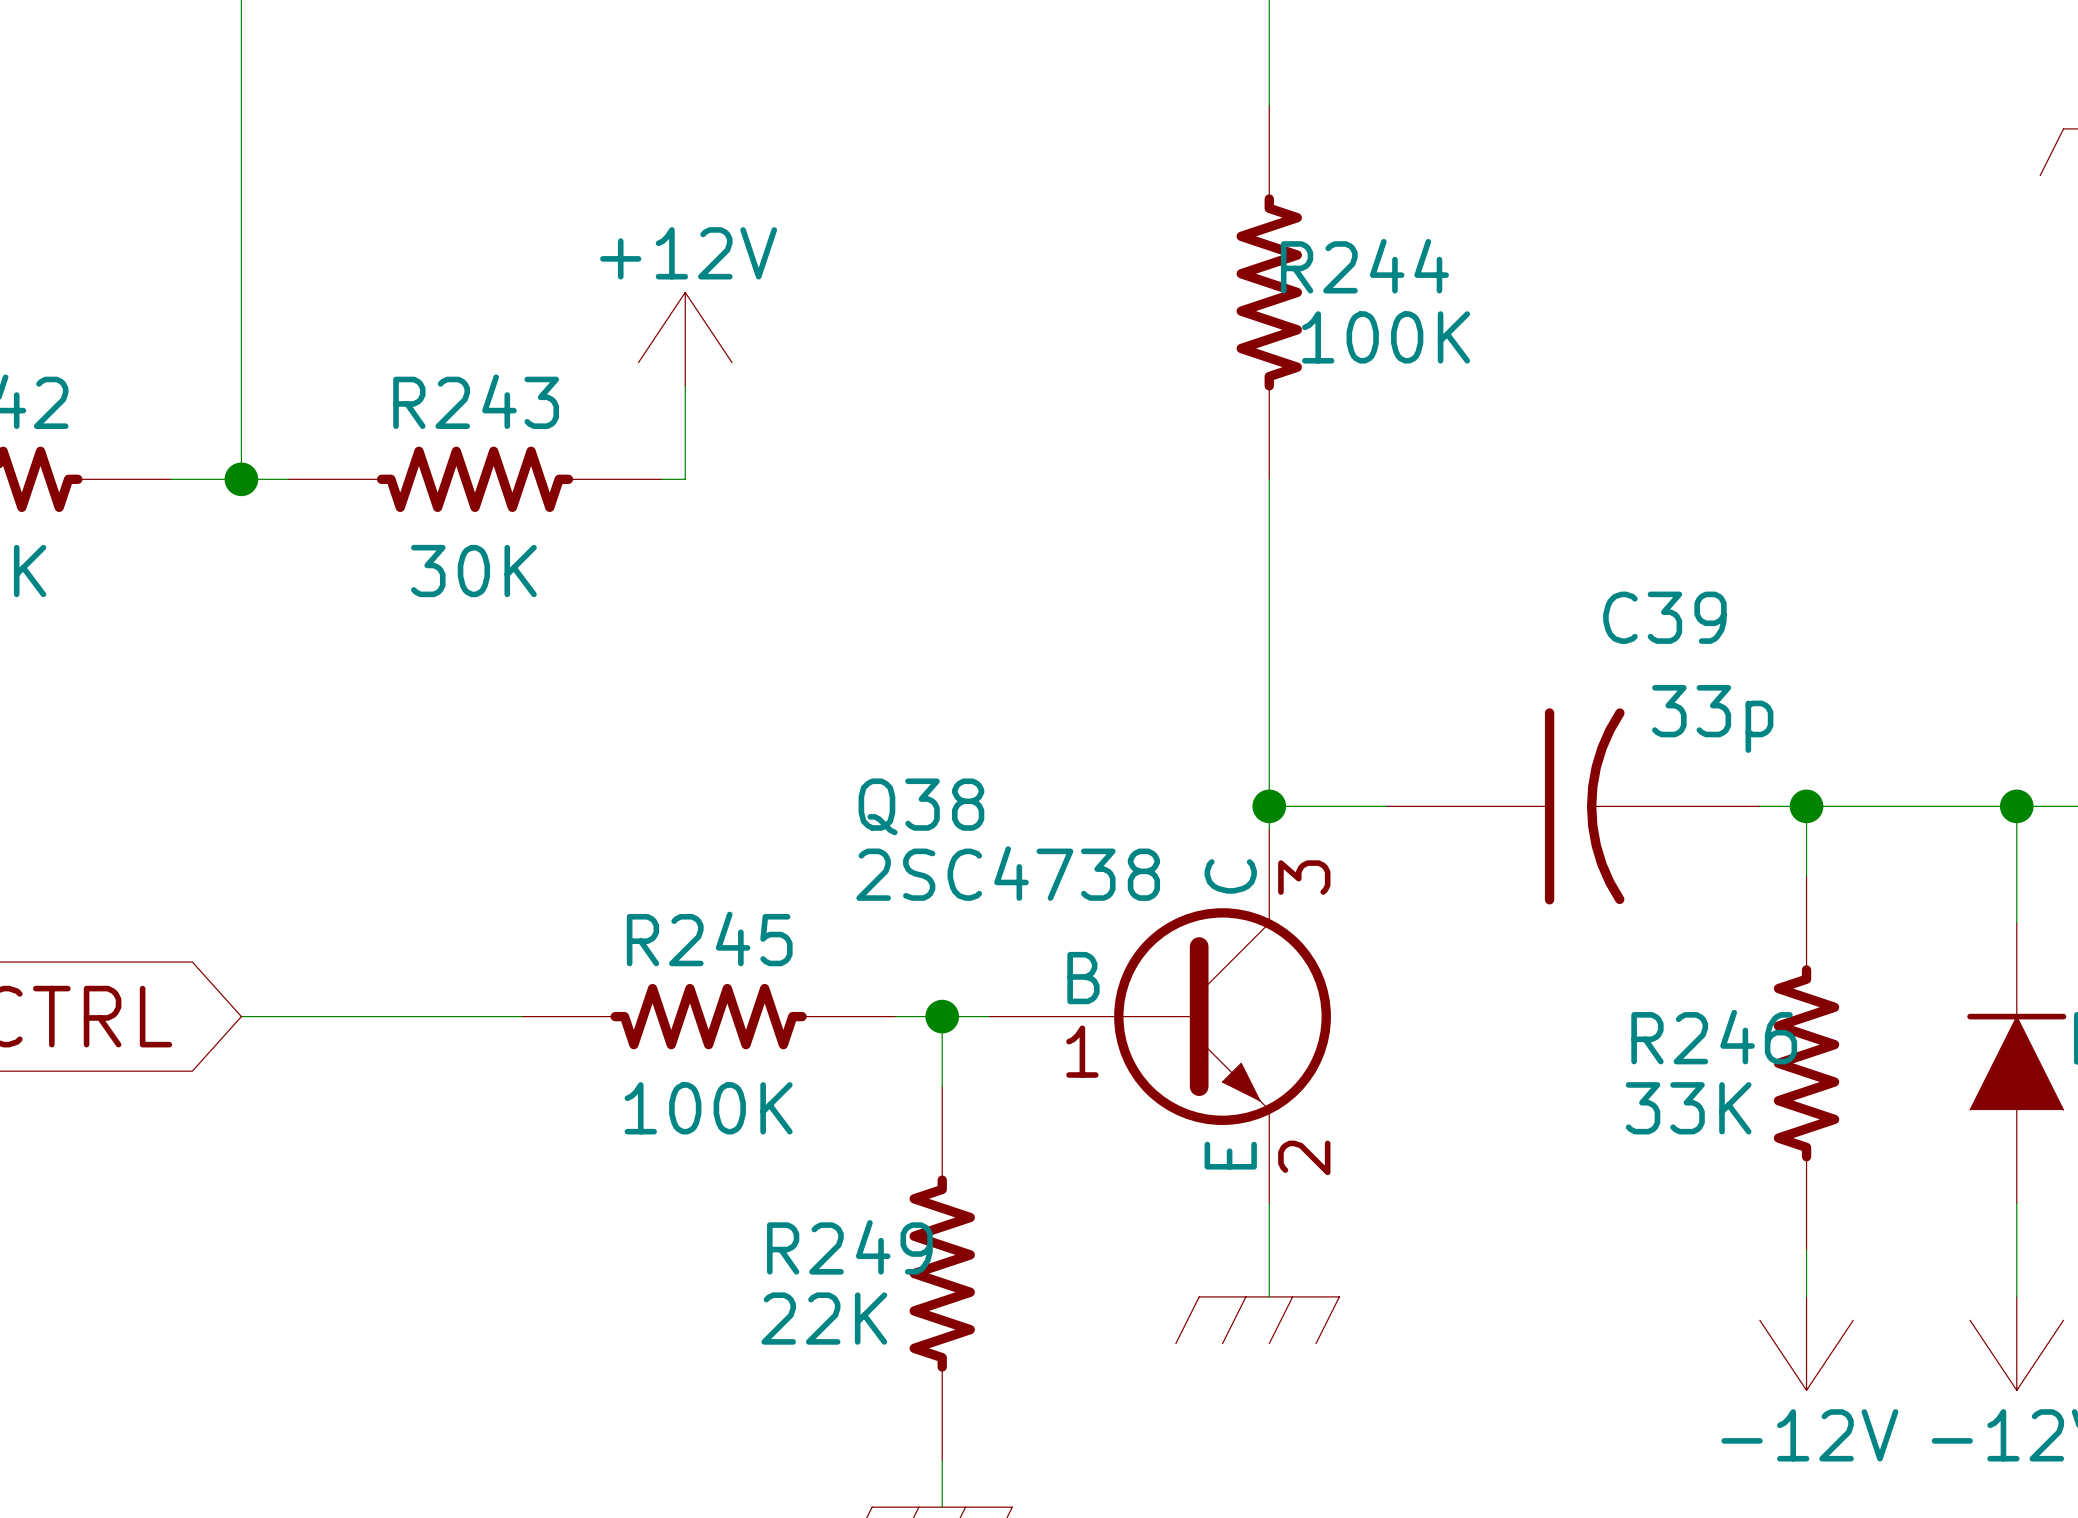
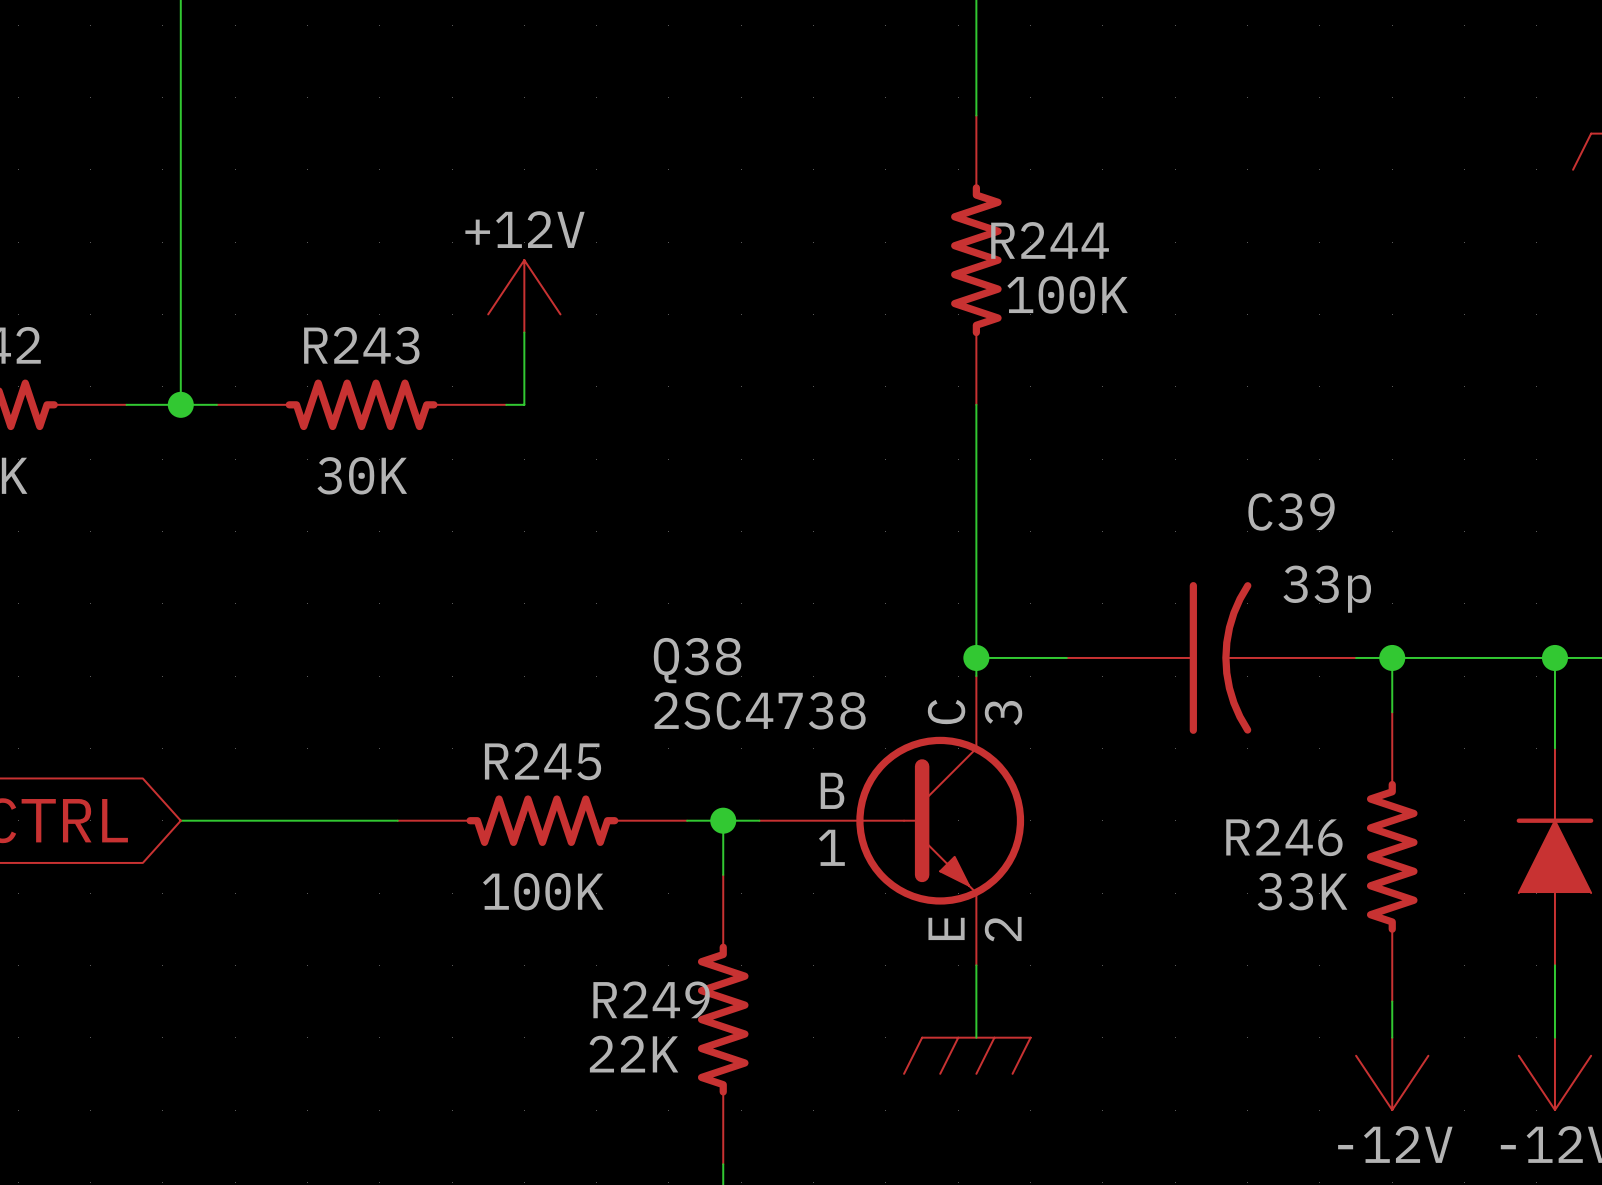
R246 name position: R246 (1714, 1037) -> R246 (1284, 837)

